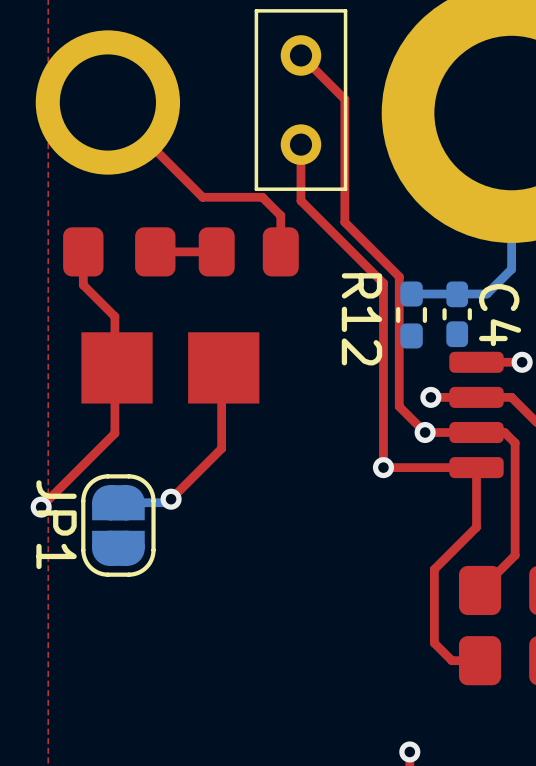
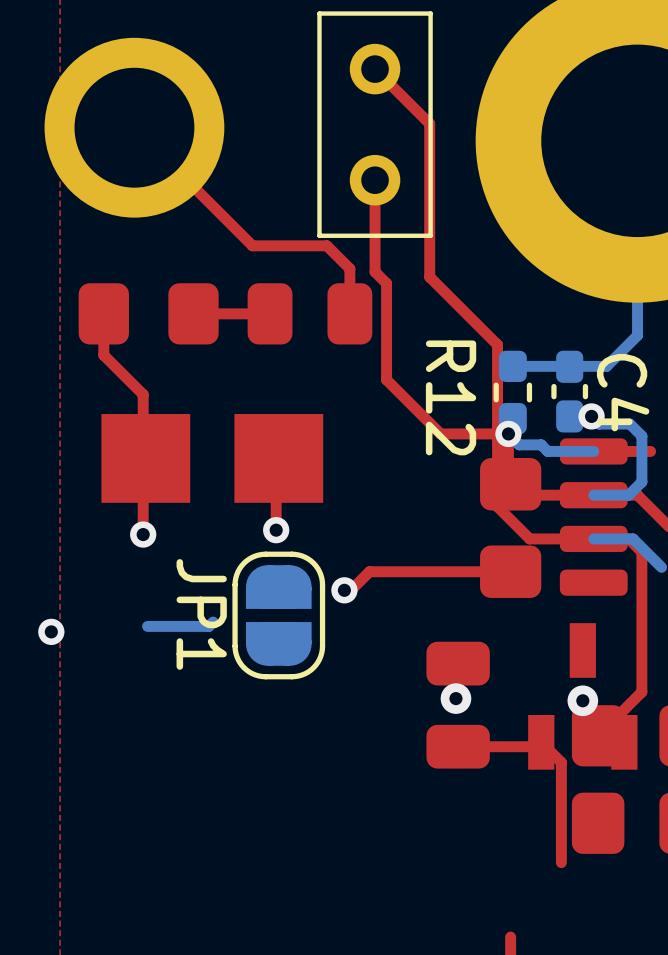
top track: (300, 200) (383, 283) (383, 467) (476, 467) (476, 527) (434, 569) (434, 643) (451, 660) (480, 660) -> (375, 250) (375, 271) (386, 283) (386, 379) (440, 433) (508, 433) (508, 482)
bottom track: none -> (591, 416) (599, 424) (629, 424) (641, 436) (641, 482) (628, 495) (593, 495)
via: none -> (591, 416)
bottom track: none -> (508, 433) (519, 444) (541, 444) (547, 451) (593, 451)
via: none -> (508, 433)
via: (522, 362) -> none
via: (430, 397) -> none
part: none -> (510, 527)
top track: (221, 425) (221, 448) (171, 499) -> none
via: none -> (276, 530)
top track: (114, 428) (114, 433) (41, 507) -> none
via: none -> (143, 534)
via: (425, 432) -> none
bottom track: none -> (593, 538) (633, 538) (661, 567)
top track: none -> (510, 571) (369, 571) (350, 590) (344, 590)
via: (383, 467) -> none
via: none -> (344, 590)
via: (171, 499) -> none
JP1 position: (118, 525) -> (278, 615)
part: none -> (582, 696)
via: none -> (455, 698)
via: none -> (582, 700)
part: none -> (458, 705)
top track: none -> (541, 742) (561, 762) (561, 862)
top track: none -> (536, 746) (458, 746)
via: (409, 751) -> none

